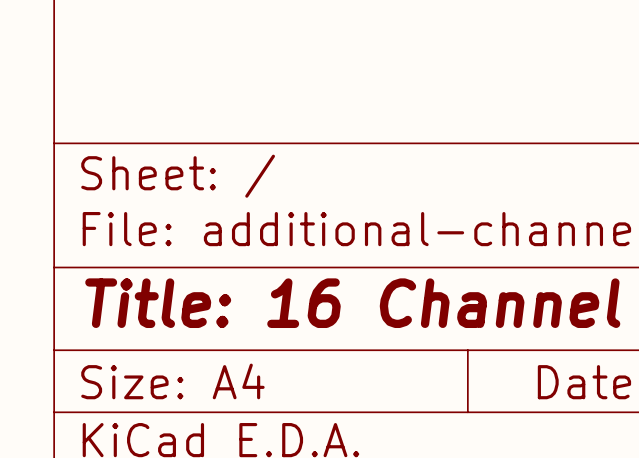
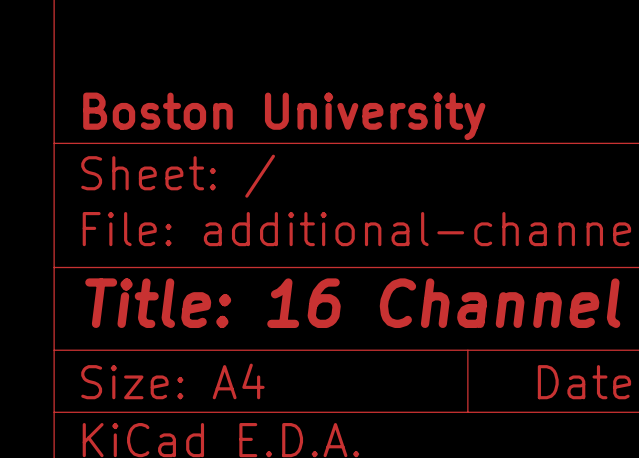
title block: none -> Boston University (284, 116)

